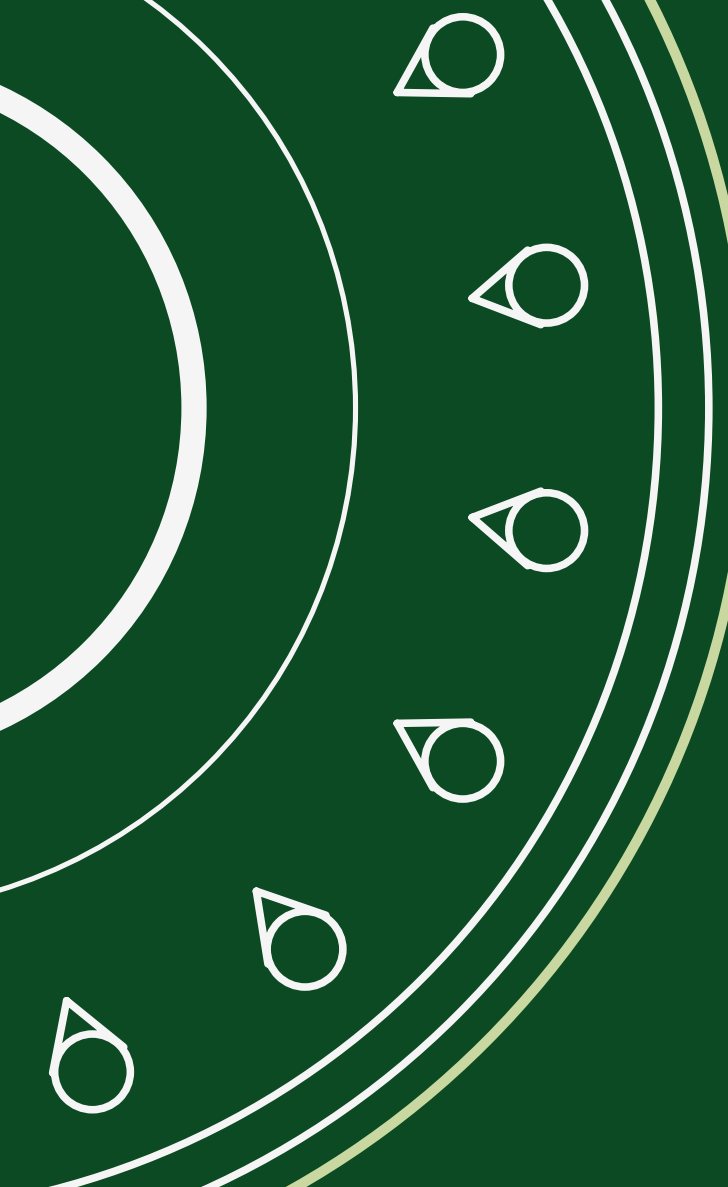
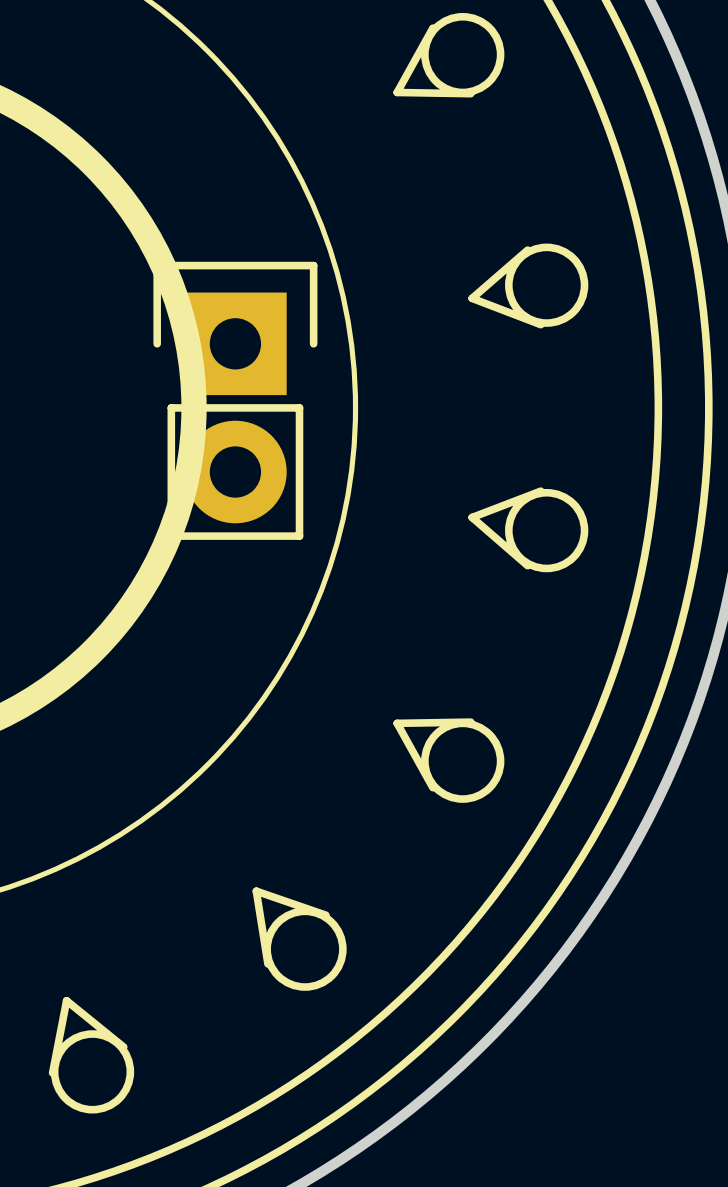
part: none -> (235, 400)

